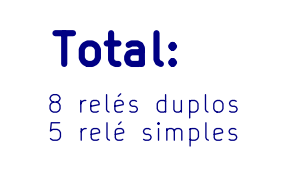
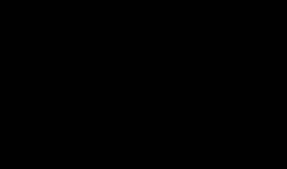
text: Total: (114, 48) -> none
text: 8 relés duplos (143, 105) -> none
text: 5 relé simples (143, 133) -> none

